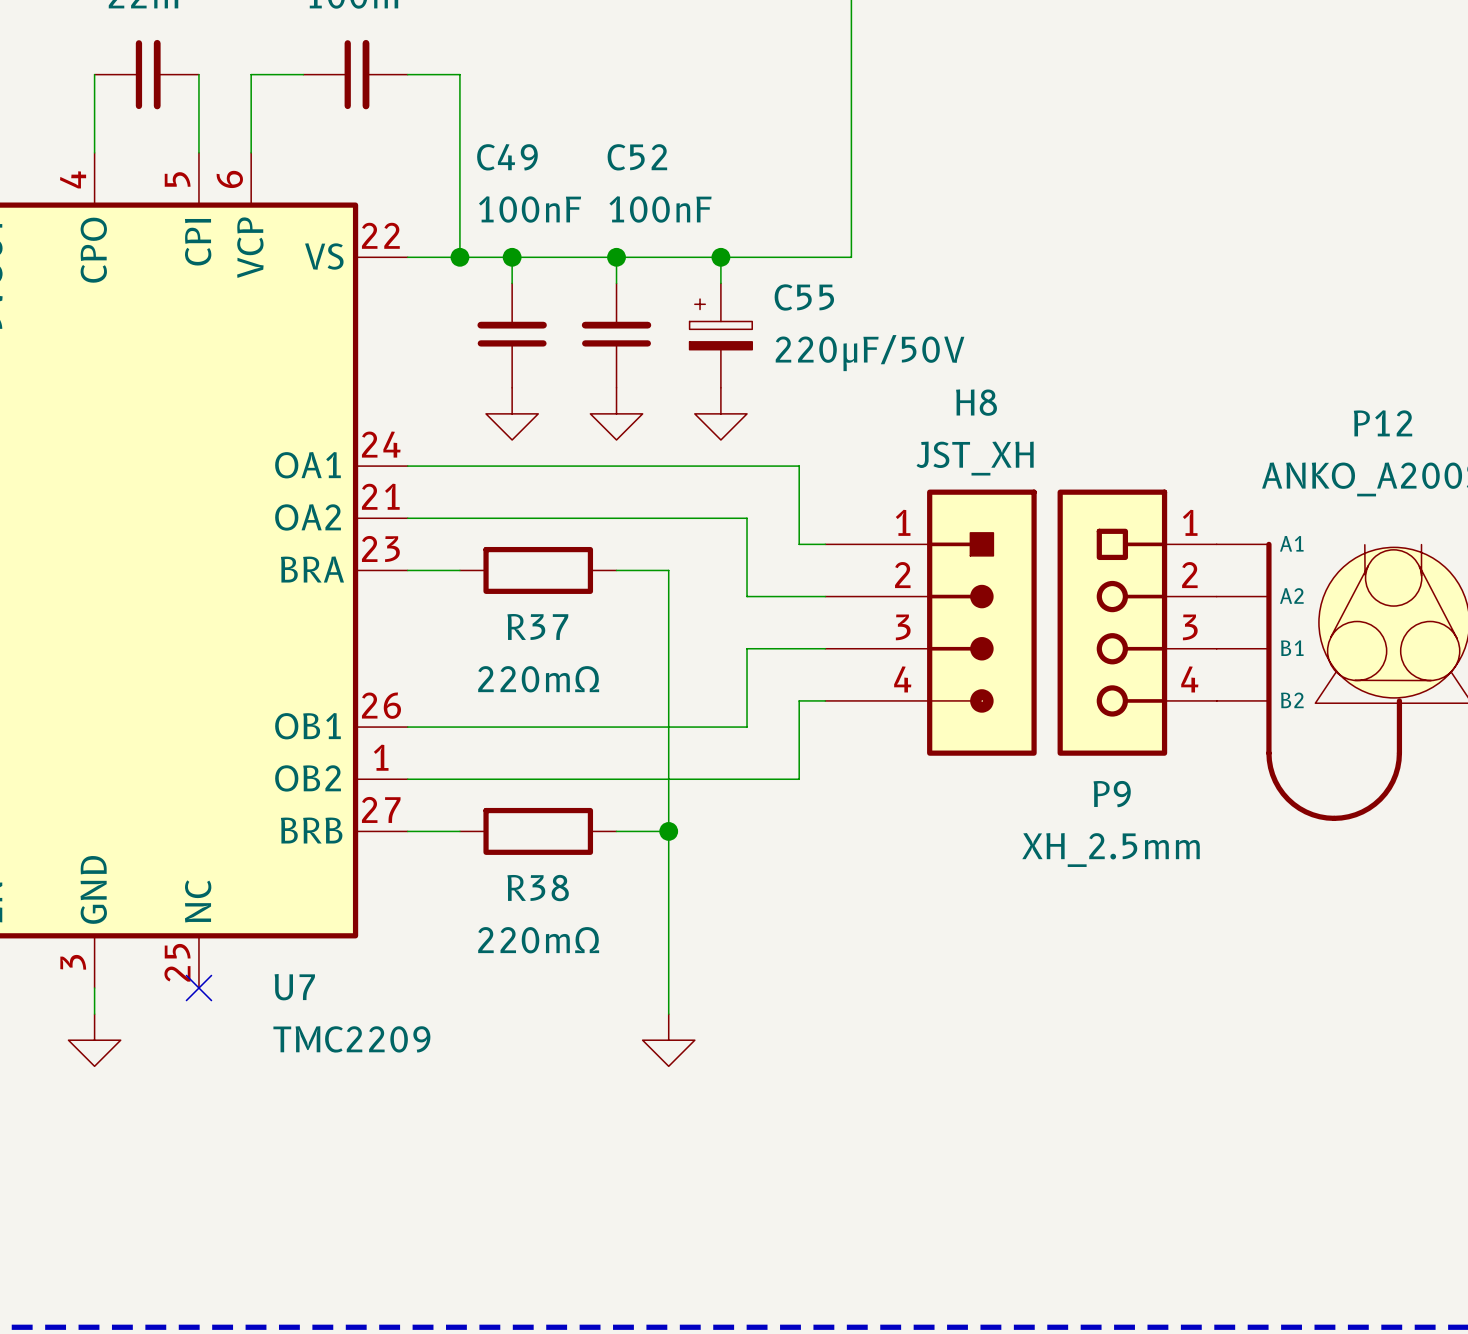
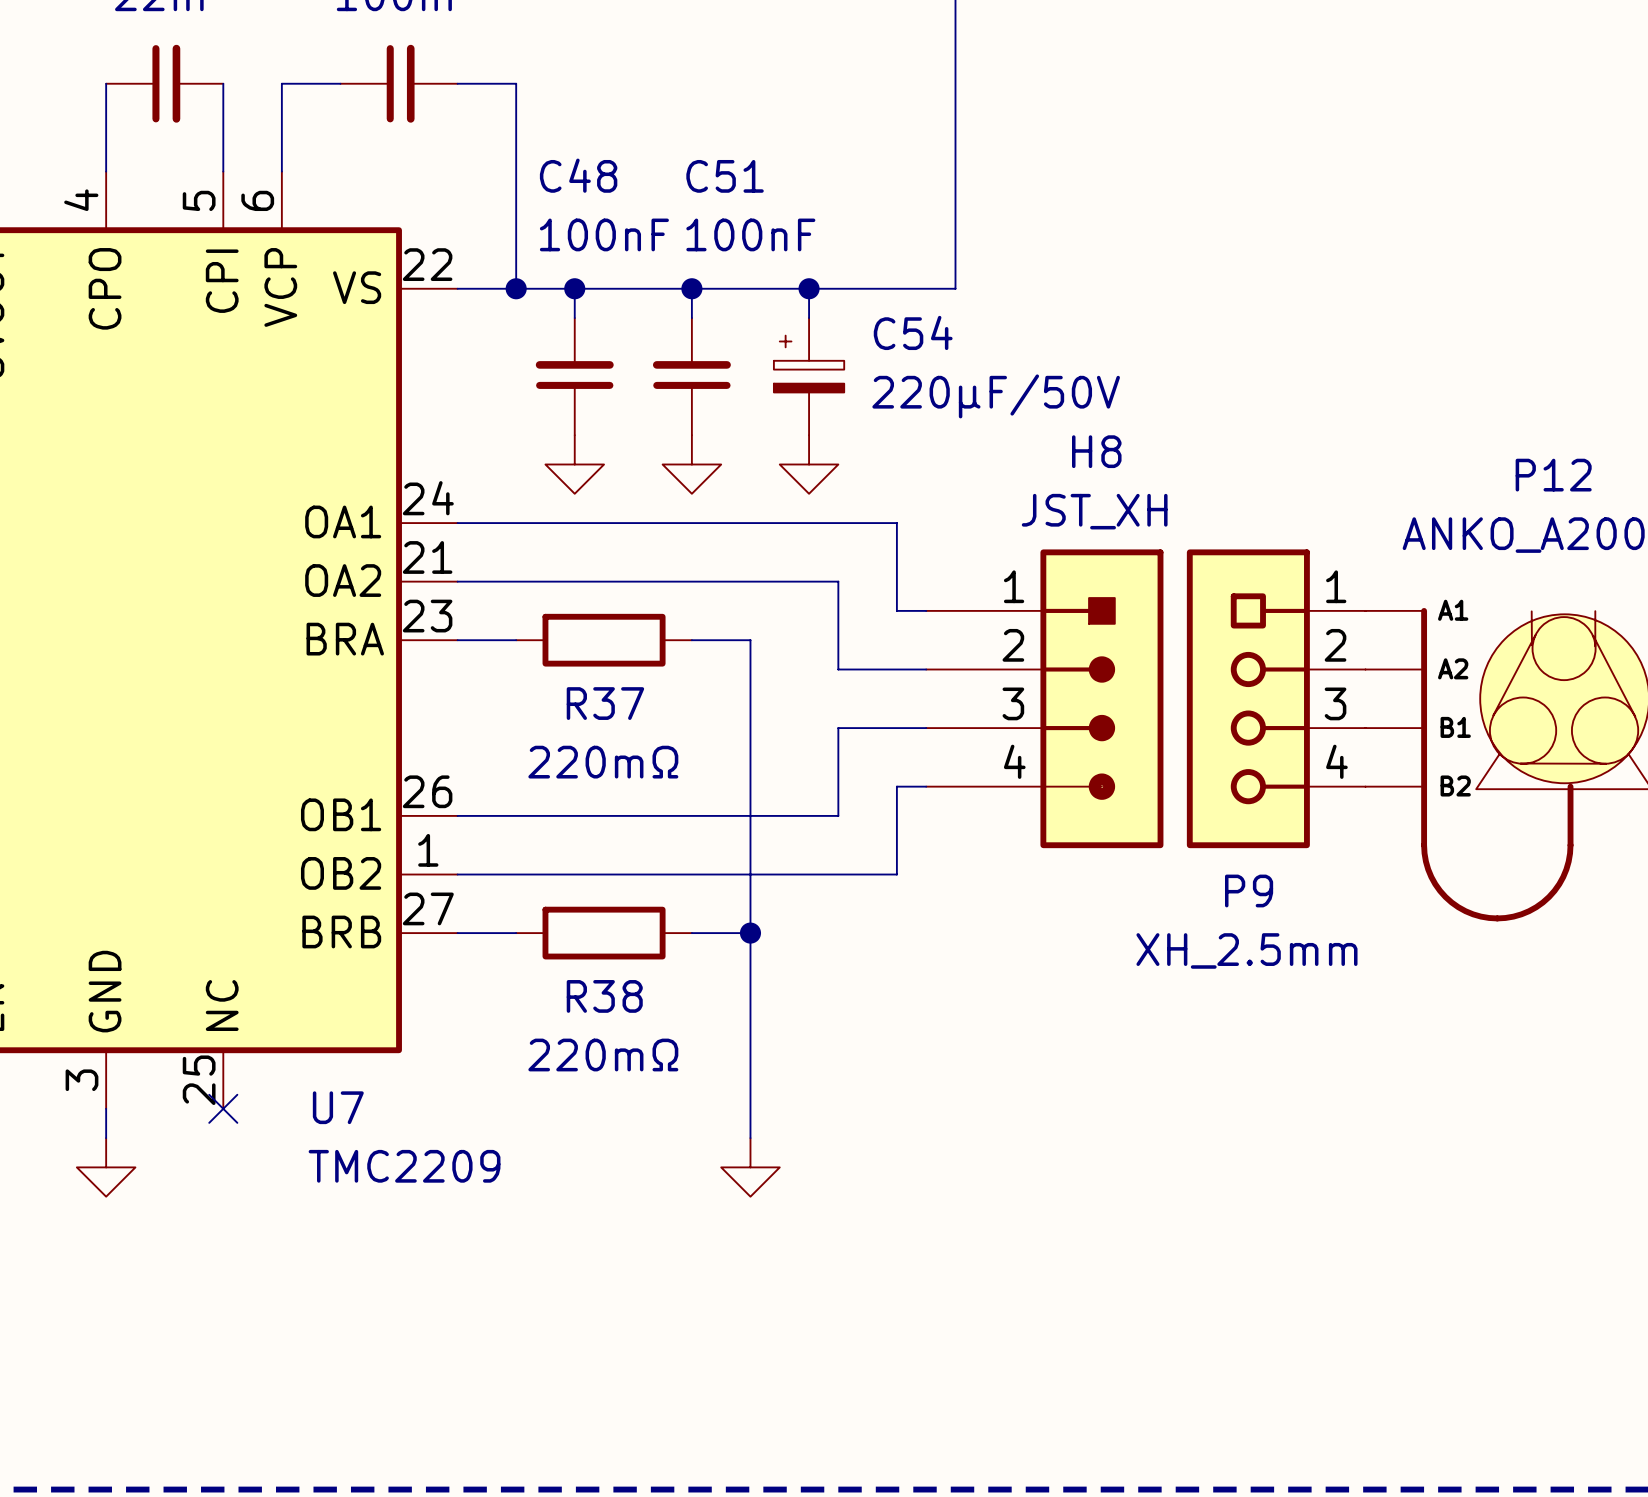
C49 name: C49 (507, 157) -> C48 (578, 175)
C52 name: C52 (637, 157) -> C51 (725, 176)
C55 name: C55 (804, 297) -> C54 (913, 332)

